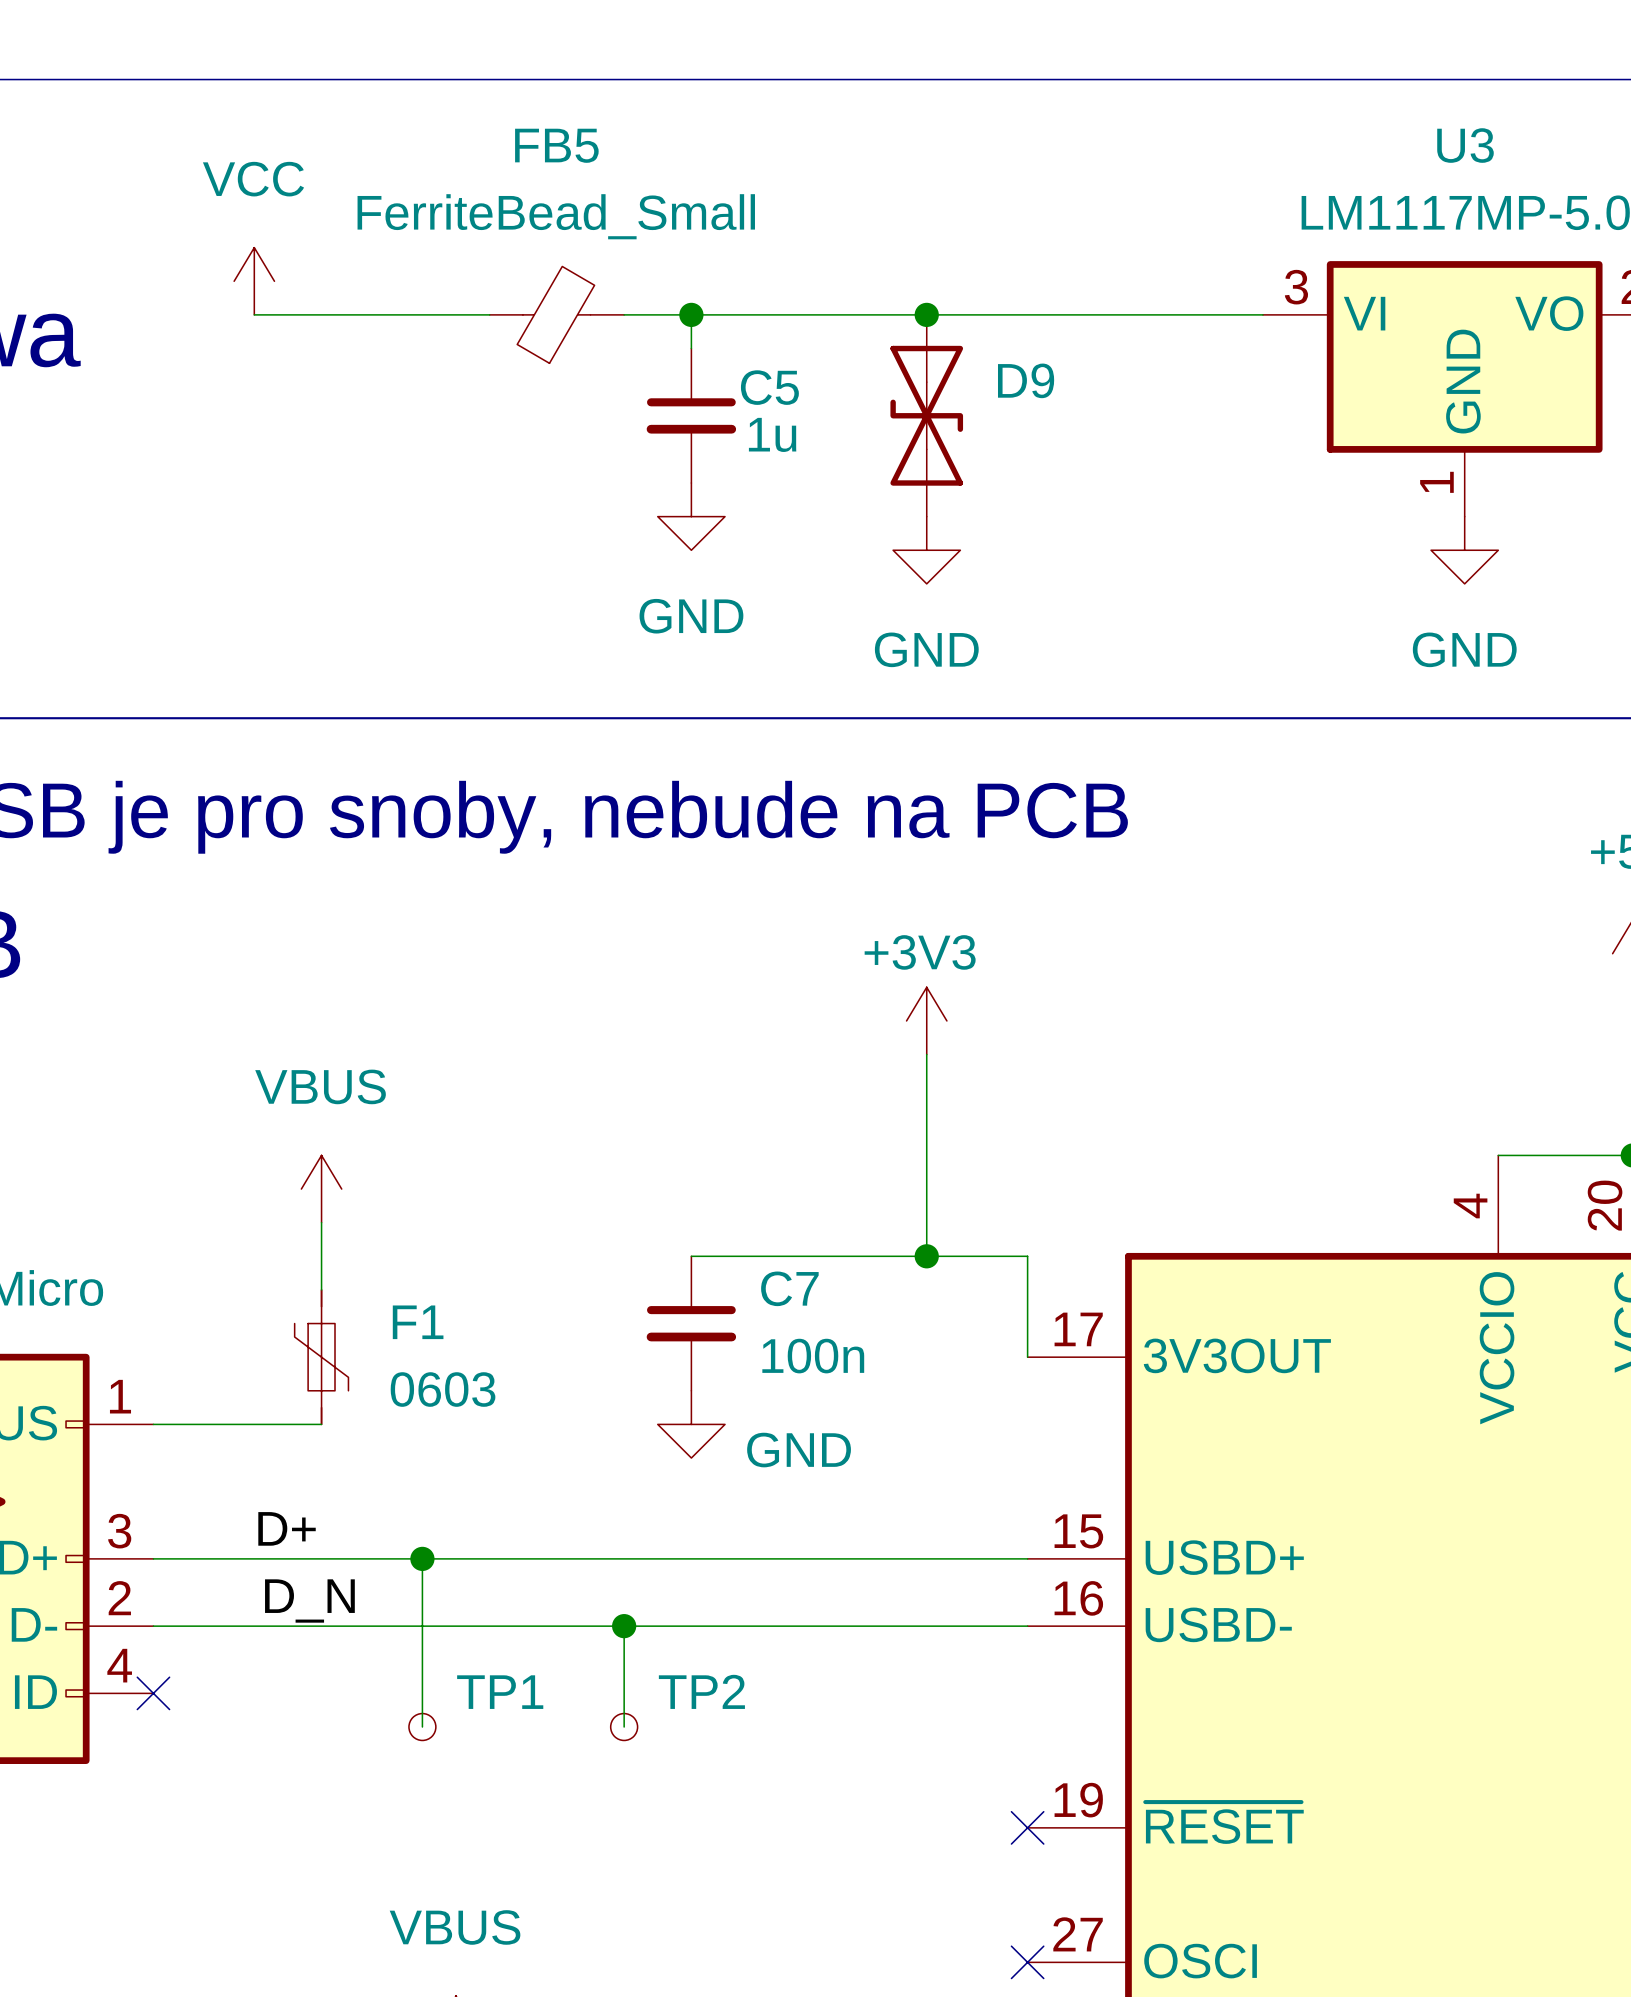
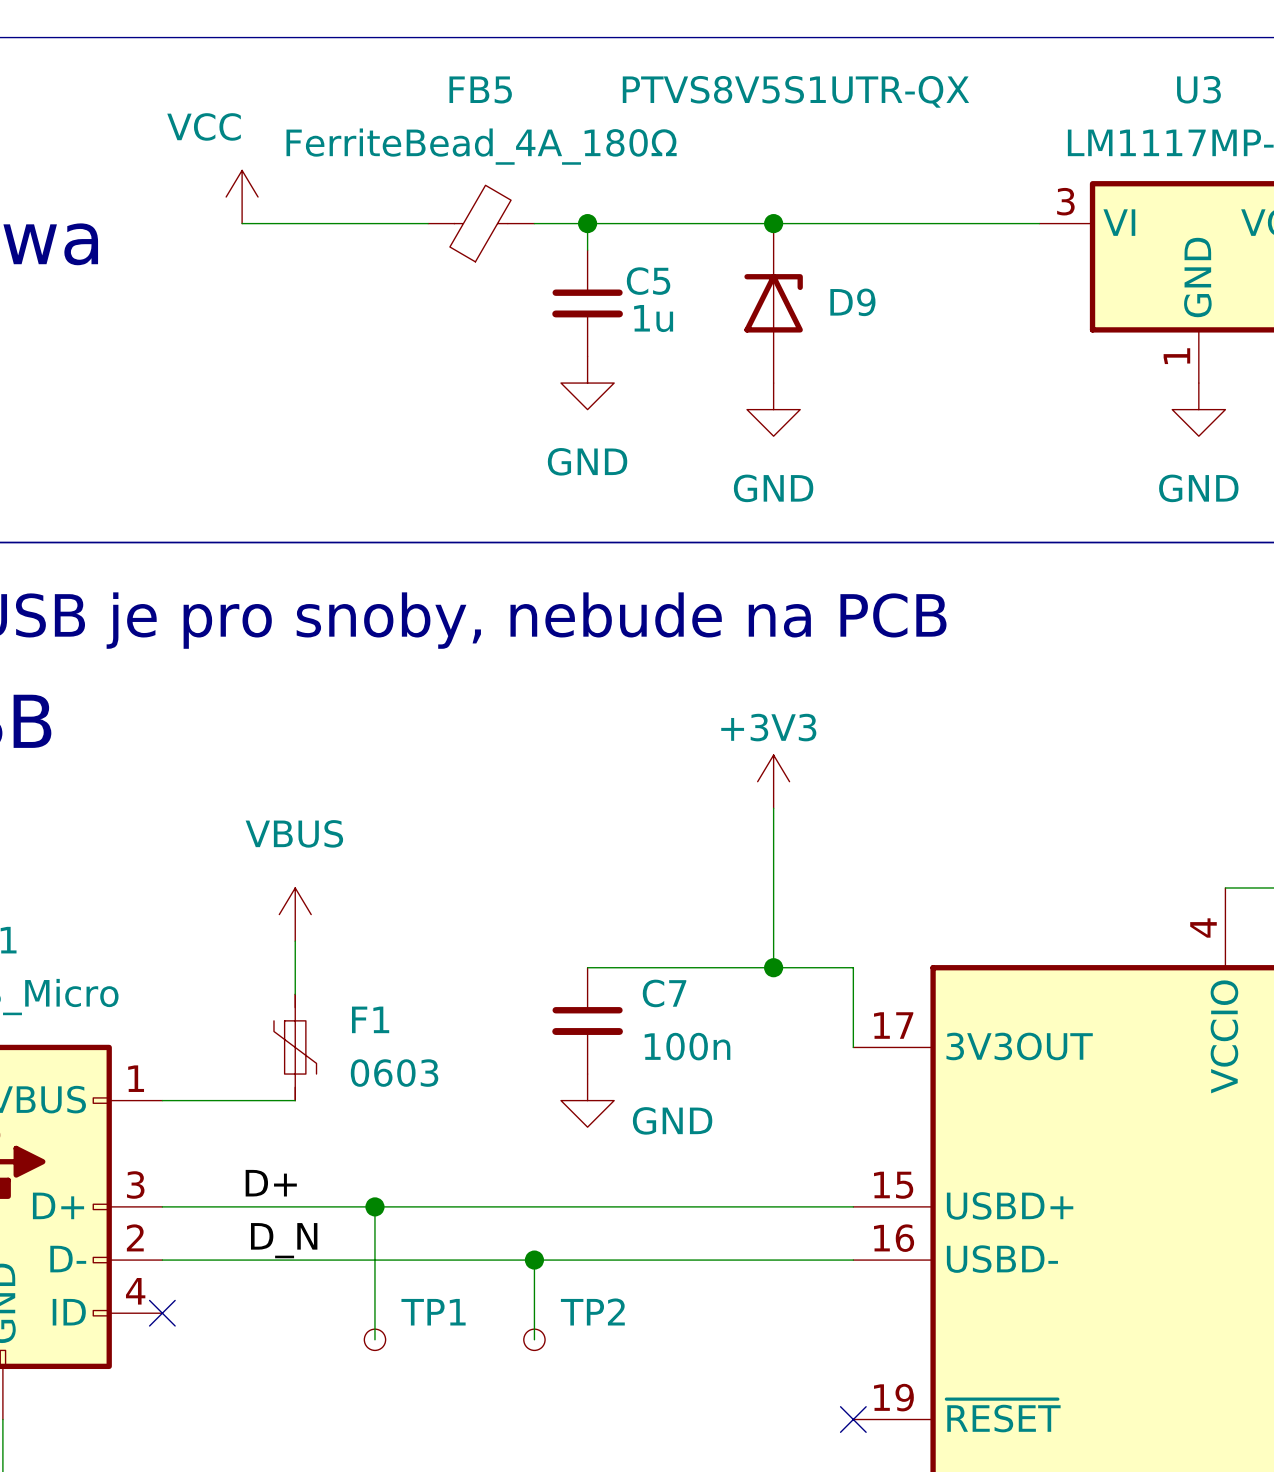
D9 value: none -> PTVS8V5S1UTR-QX (795, 91)
power symbol text position: VCC (253, 179) -> VCC (204, 126)
FB5 value: FerriteBead_Small (556, 216) -> FerriteBead_4A_180Ω (481, 146)
D9 symbol: [890, 314, 964, 517] -> [744, 223, 803, 384]

